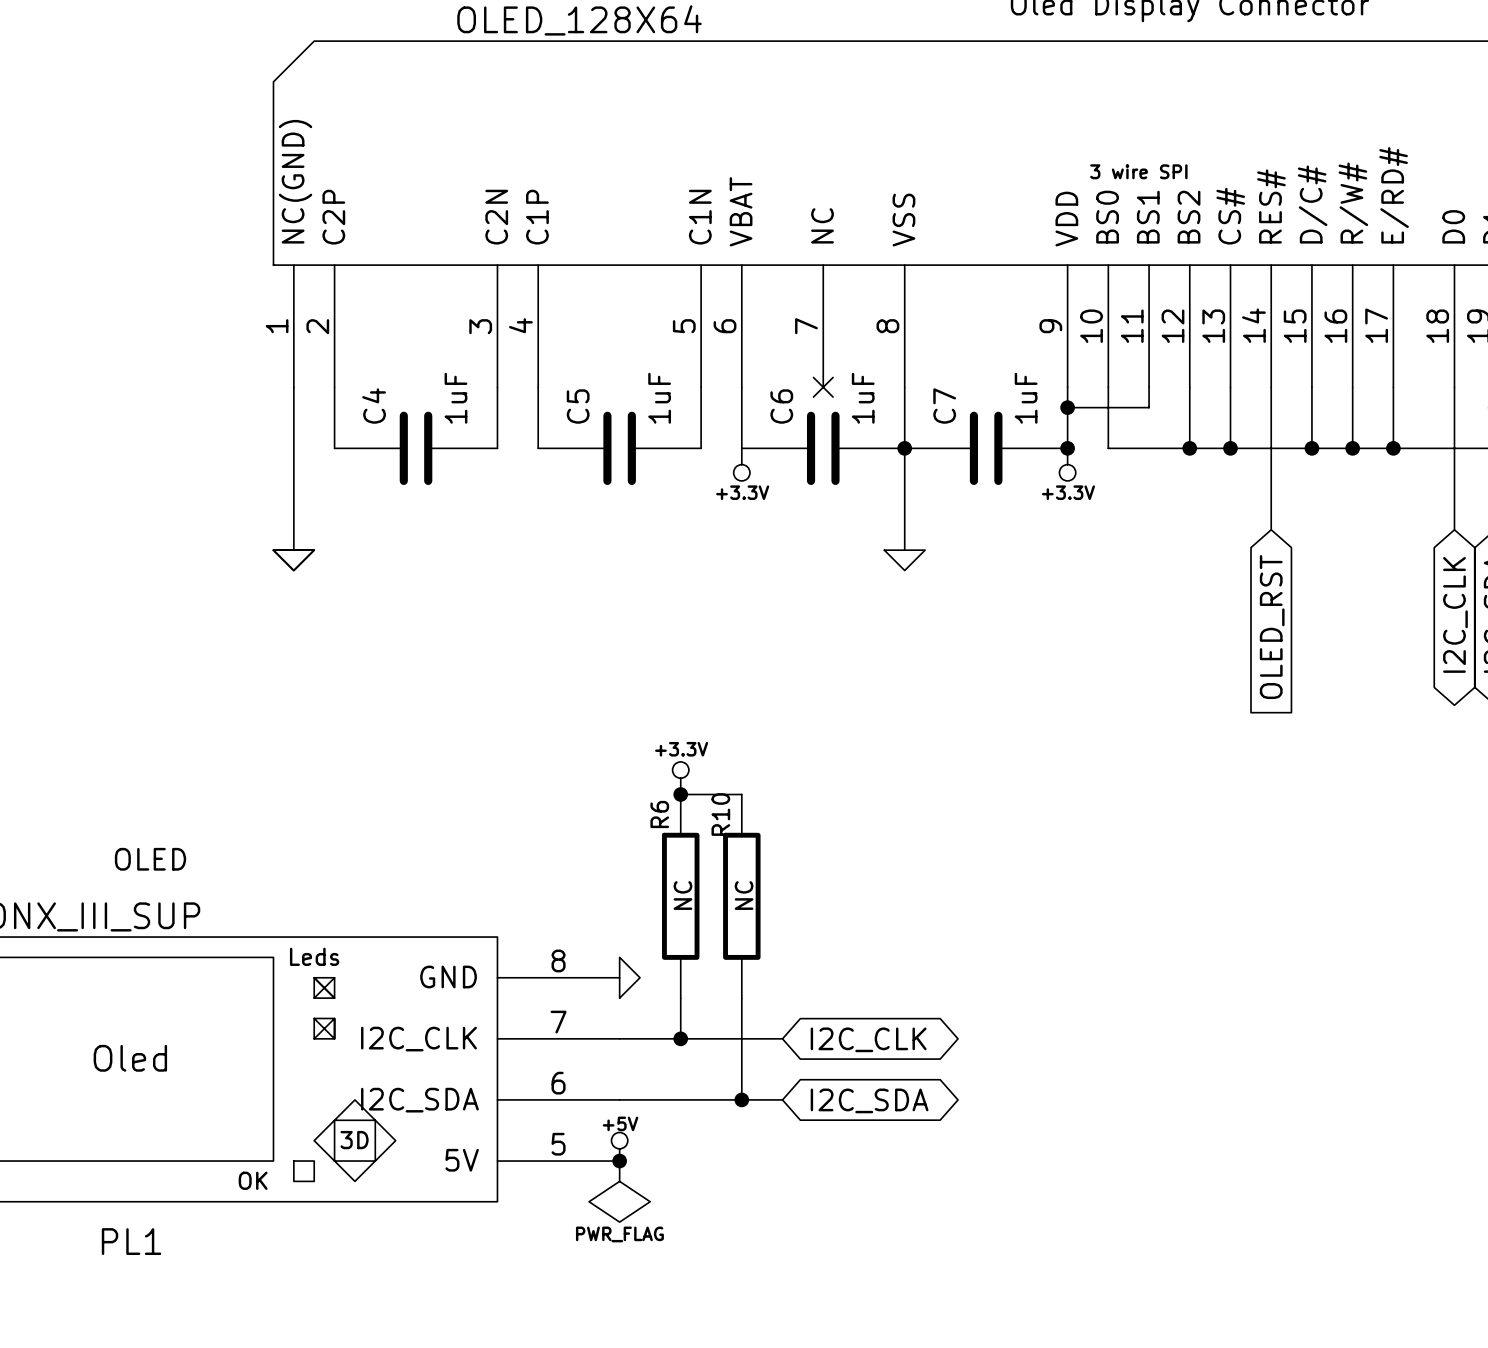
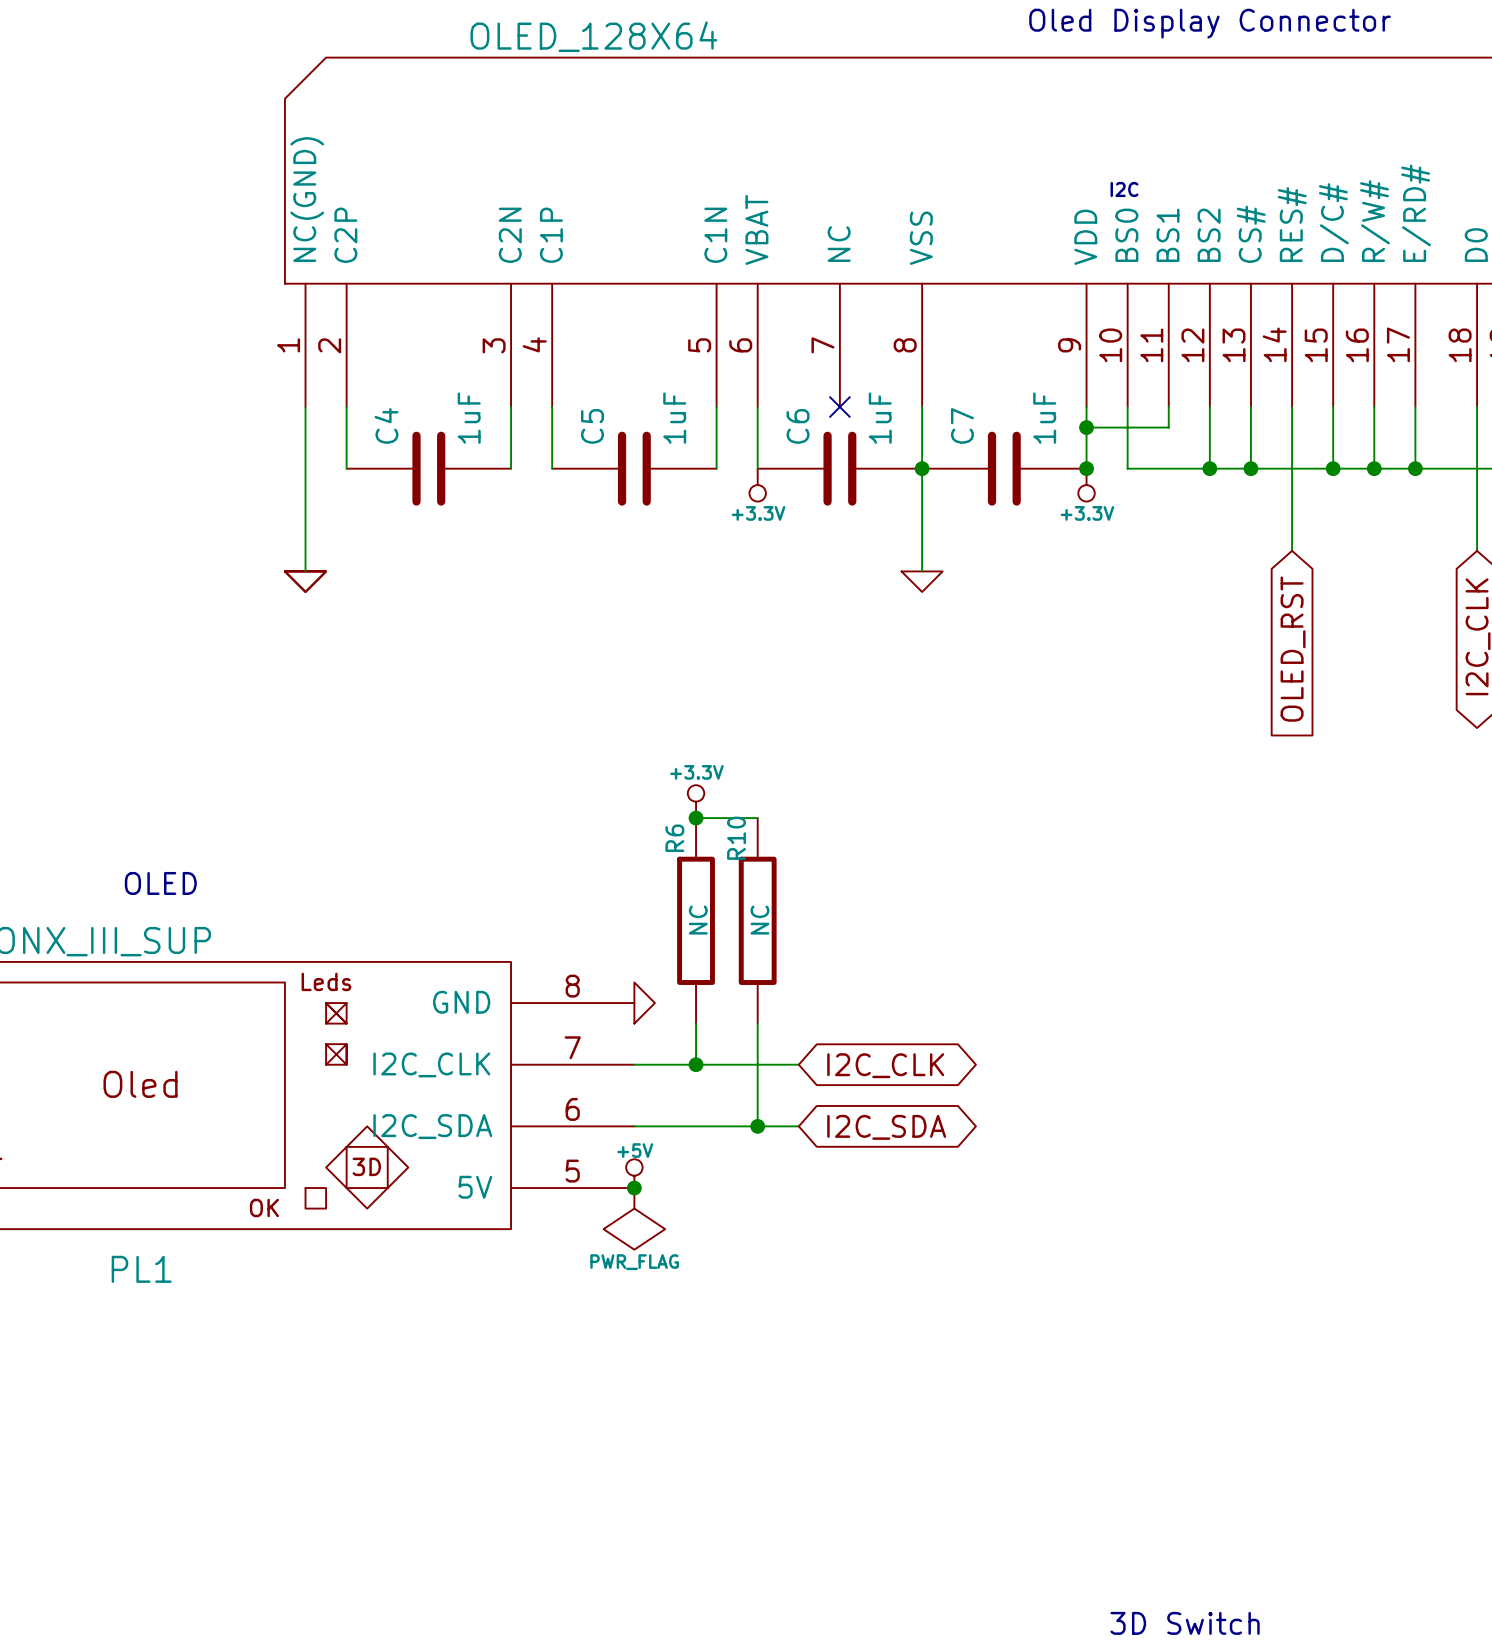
text: 3 wire SPI (1138, 171) -> I2C (1124, 189)

